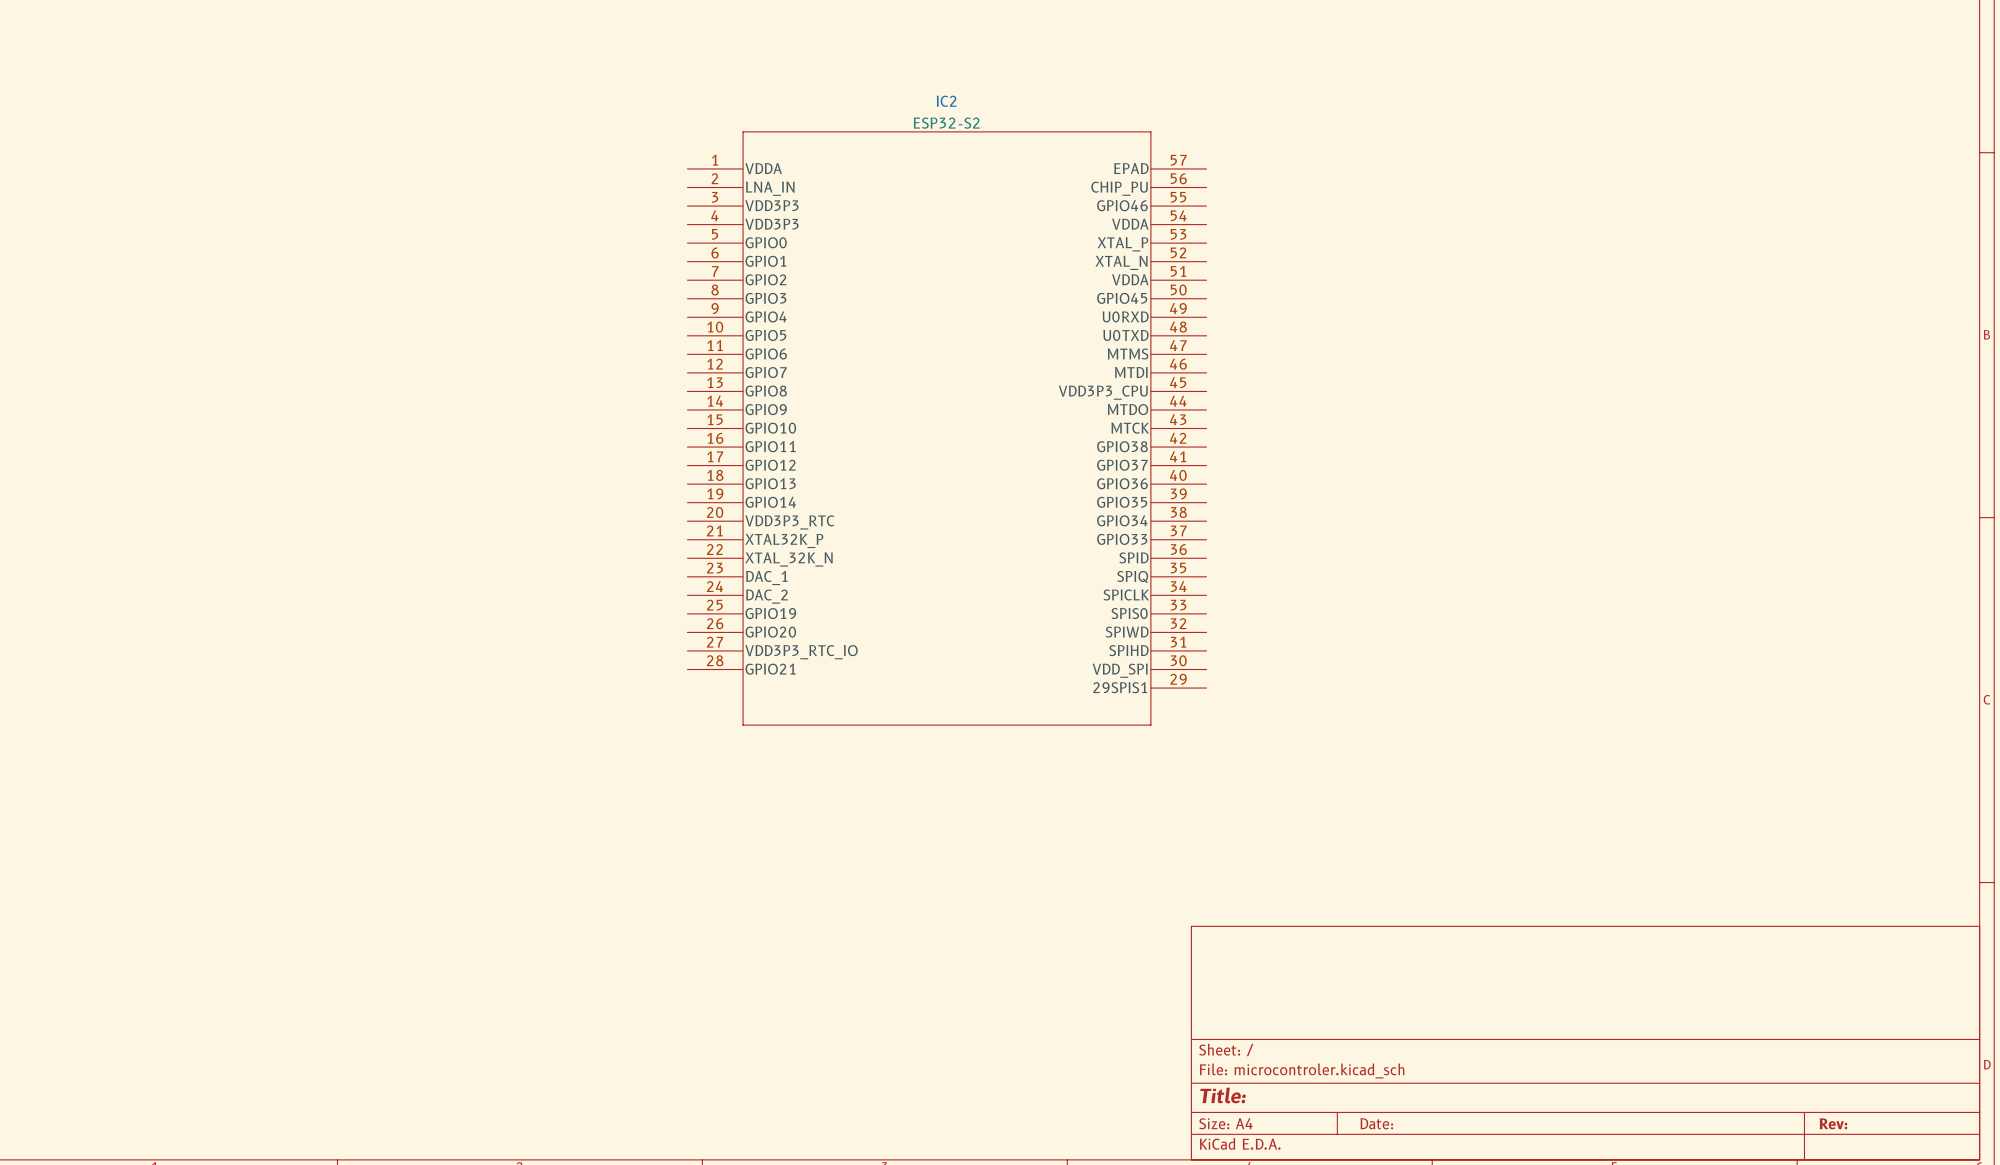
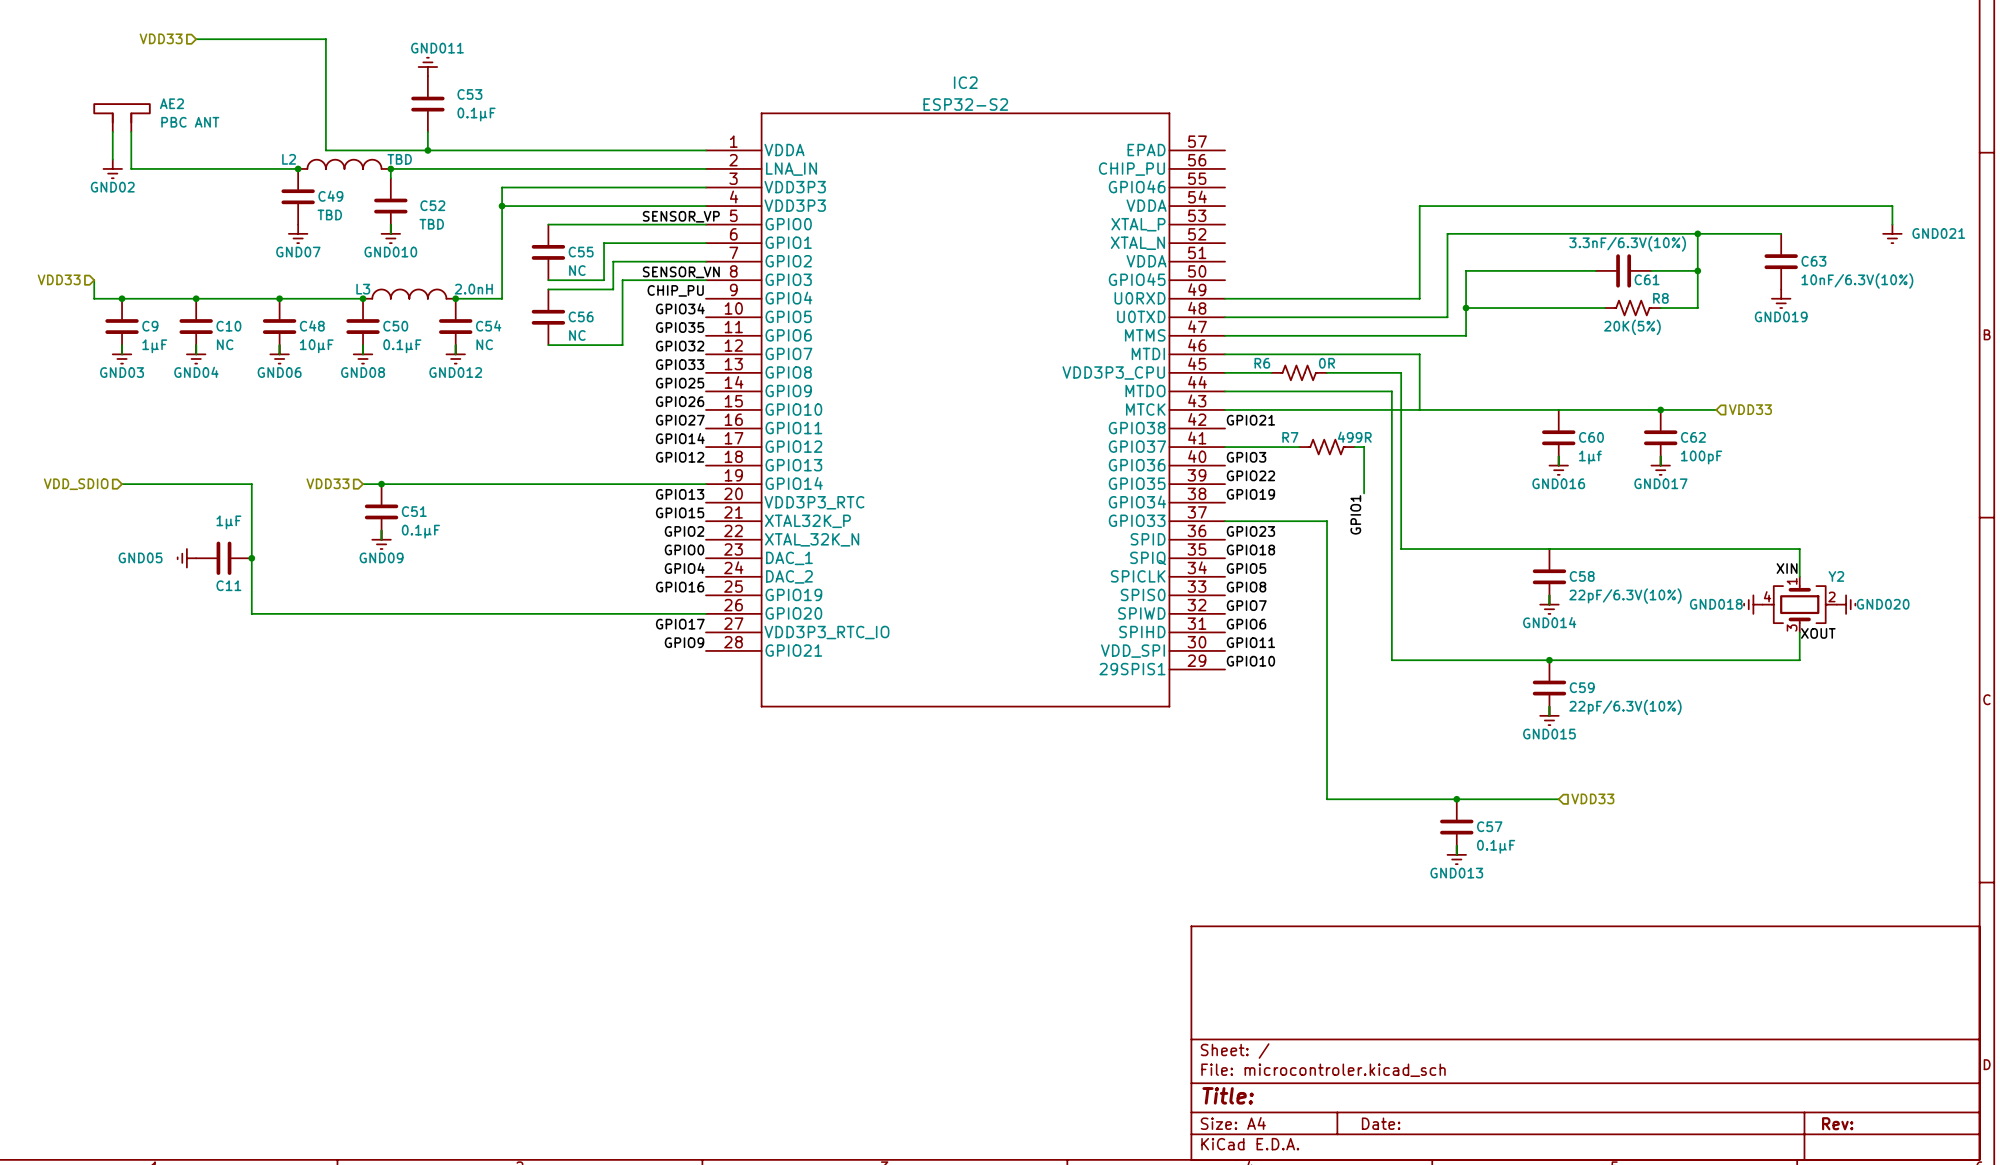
hierarchical label: none -> VDD33 (161, 38)
wire: none -> (196, 39) (325, 39) (325, 150) (705, 150)
GND011: none -> (427, 67)
C53: none -> 0.1µF (427, 104)
AE2: none -> PBC ANT (122, 117)
wire: none -> (112, 131) (112, 159)
wire: none -> (131, 131) (131, 168) (298, 168)
wire: none -> (427, 131) (427, 150)
junction: none -> (427, 150)
L2: none -> TBD (344, 164)
GND02: none -> (112, 168)
junction: none -> (298, 168)
junction: none -> (390, 168)
wire: none -> (705, 168) (390, 168) (390, 178)
wire: none -> (705, 187) (502, 187) (502, 298) (455, 298)
C49: none -> TBD (298, 196)
C52: none -> TBD (390, 206)
wire: none -> (502, 206) (705, 206)
junction: none -> (502, 206)
label: none -> SENSOR_VP (681, 216)
wire: none -> (390, 224) (390, 233)
wire: none -> (548, 224) (705, 224)
wire: none -> (1892, 224) (1892, 206) (1419, 206) (1419, 298) (1225, 298)
GND07: none -> (298, 233)
GND010: none -> (390, 233)
wire: none -> (1697, 233) (1697, 308) (1660, 308)
junction: none -> (1697, 233)
wire: none -> (1781, 233) (1447, 233) (1447, 317) (1225, 317)
GND021: none -> (1892, 233)
wire: none -> (705, 243) (604, 243) (604, 280) (548, 280)
C55: none -> NC (548, 252)
wire: none -> (705, 261) (613, 261) (613, 289) (548, 289)
C63: none -> 10nF/6.3V(10%) (1781, 261)
wire: none -> (1595, 270) (1466, 270) (1466, 335) (1225, 335)
C61: none -> 3.3nF/6.3V(10%) (1623, 270)
wire: none -> (1651, 270) (1697, 270)
junction: none -> (1697, 270)
label: none -> SENSOR_VN (681, 272)
hierarchical label: none -> VDD33 (59, 279)
wire: none -> (94, 280) (94, 298) (363, 298)
wire: none -> (705, 280) (622, 280) (622, 345) (548, 345)
label: none -> CHIP_PU (675, 290)
L3: none -> 2.0nH (409, 294)
junction: none -> (122, 298)
junction: none -> (196, 298)
junction: none -> (279, 298)
junction: none -> (363, 298)
junction: none -> (455, 298)
GND019: none -> (1781, 298)
wire: none -> (1466, 308) (1605, 308)
junction: none -> (1466, 308)
R8: none -> 20K(5%) (1632, 308)
label: none -> GPIO34 (680, 308)
C56: none -> NC (548, 317)
C9: none -> 1µF (122, 326)
C10: none -> NC (196, 326)
C48: none -> 10µF (279, 326)
C50: none -> 0.1µF (363, 326)
C54: none -> NC (455, 326)
label: none -> GPIO35 (680, 327)
wire: none -> (122, 345) (122, 354)
wire: none -> (196, 345) (196, 354)
wire: none -> (279, 345) (279, 354)
wire: none -> (363, 345) (363, 354)
wire: none -> (455, 345) (455, 354)
label: none -> GPIO32 (680, 346)
GND03: none -> (122, 354)
GND04: none -> (196, 354)
GND06: none -> (279, 354)
GND08: none -> (363, 354)
GND012: none -> (455, 354)
wire: none -> (1225, 354) (1419, 354) (1419, 409)
label: none -> GPIO33 (680, 364)
wire: none -> (1225, 372) (1271, 372)
R6: none -> 0R (1299, 372)
wire: none -> (1327, 372) (1401, 372) (1401, 549) (1799, 549) (1799, 576)
label: none -> GPIO25 (680, 383)
wire: none -> (1225, 391) (1391, 391) (1391, 660) (1799, 660) (1799, 632)
label: none -> GPIO26 (680, 401)
wire: none -> (1225, 409) (1716, 409)
junction: none -> (1660, 409)
hierarchical label: none -> VDD33 (1750, 409)
label: none -> GPIO27 (680, 420)
label: none -> GPIO21 (1250, 420)
IC2 position: (946, 428) -> (965, 409)
C60: none -> 1µf (1558, 437)
C62: none -> 100pF (1660, 437)
label: none -> GPIO14 (680, 438)
wire: none -> (1225, 447) (1299, 447)
R7: none -> 499R (1327, 447)
wire: none -> (1354, 447) (1364, 447) (1364, 493)
wire: none -> (1558, 456) (1558, 465)
wire: none -> (1660, 456) (1660, 465)
label: none -> GPIO12 (680, 457)
label: none -> GPIO3 (1246, 457)
GND016: none -> (1558, 465)
GND017: none -> (1660, 465)
label: none -> GPIO22 (1250, 475)
hierarchical label: none -> VDD33 (328, 483)
wire: none -> (122, 484) (251, 484) (251, 613) (705, 613)
wire: none -> (363, 484) (705, 484)
junction: none -> (381, 484)
hierarchical label: none -> VDD_SDIO (76, 484)
label: none -> GPIO13 (680, 494)
label: none -> GPIO19 (1250, 494)
C51: none -> 0.1µF (381, 511)
label: none -> GPIO15 (680, 512)
label: none -> GPIO1 (1355, 514)
wire: none -> (1225, 521) (1327, 521) (1327, 799) (1558, 799)
wire: none -> (381, 530) (381, 539)
label: none -> GPIO2 (684, 531)
label: none -> GPIO23 (1250, 531)
GND09: none -> (381, 539)
label: none -> GPIO0 (684, 550)
label: none -> GPIO18 (1250, 550)
GND05: none -> (186, 558)
C11: none -> 1µF (223, 558)
junction: none -> (251, 558)
label: none -> GPIO4 (684, 568)
label: none -> GPIO5 (1246, 568)
label: none -> XIN (1787, 568)
C58: none -> 22pF/6.3V(10%) (1549, 576)
label: none -> GPIO16 (680, 587)
label: none -> GPIO8 (1246, 587)
wire: none -> (1549, 595) (1549, 604)
GND014: none -> (1549, 604)
GND018: none -> (1753, 604)
Y2: none -> (1799, 604)
GND020: none -> (1846, 604)
label: none -> GPIO7 (1246, 605)
label: none -> GPIO17 (680, 624)
label: none -> GPIO6 (1246, 624)
label: none -> XOUT (1818, 633)
label: none -> GPIO9 (684, 642)
label: none -> GPIO11 (1250, 642)
junction: none -> (1549, 660)
label: none -> GPIO10 (1250, 661)
C59: none -> 22pF/6.3V(10%) (1549, 688)
wire: none -> (1549, 706) (1549, 715)
GND015: none -> (1549, 715)
hierarchical label: none -> VDD33 (1592, 798)
junction: none -> (1456, 799)
C57: none -> 0.1µF (1456, 827)
wire: none -> (1456, 845) (1456, 854)
GND013: none -> (1456, 854)

